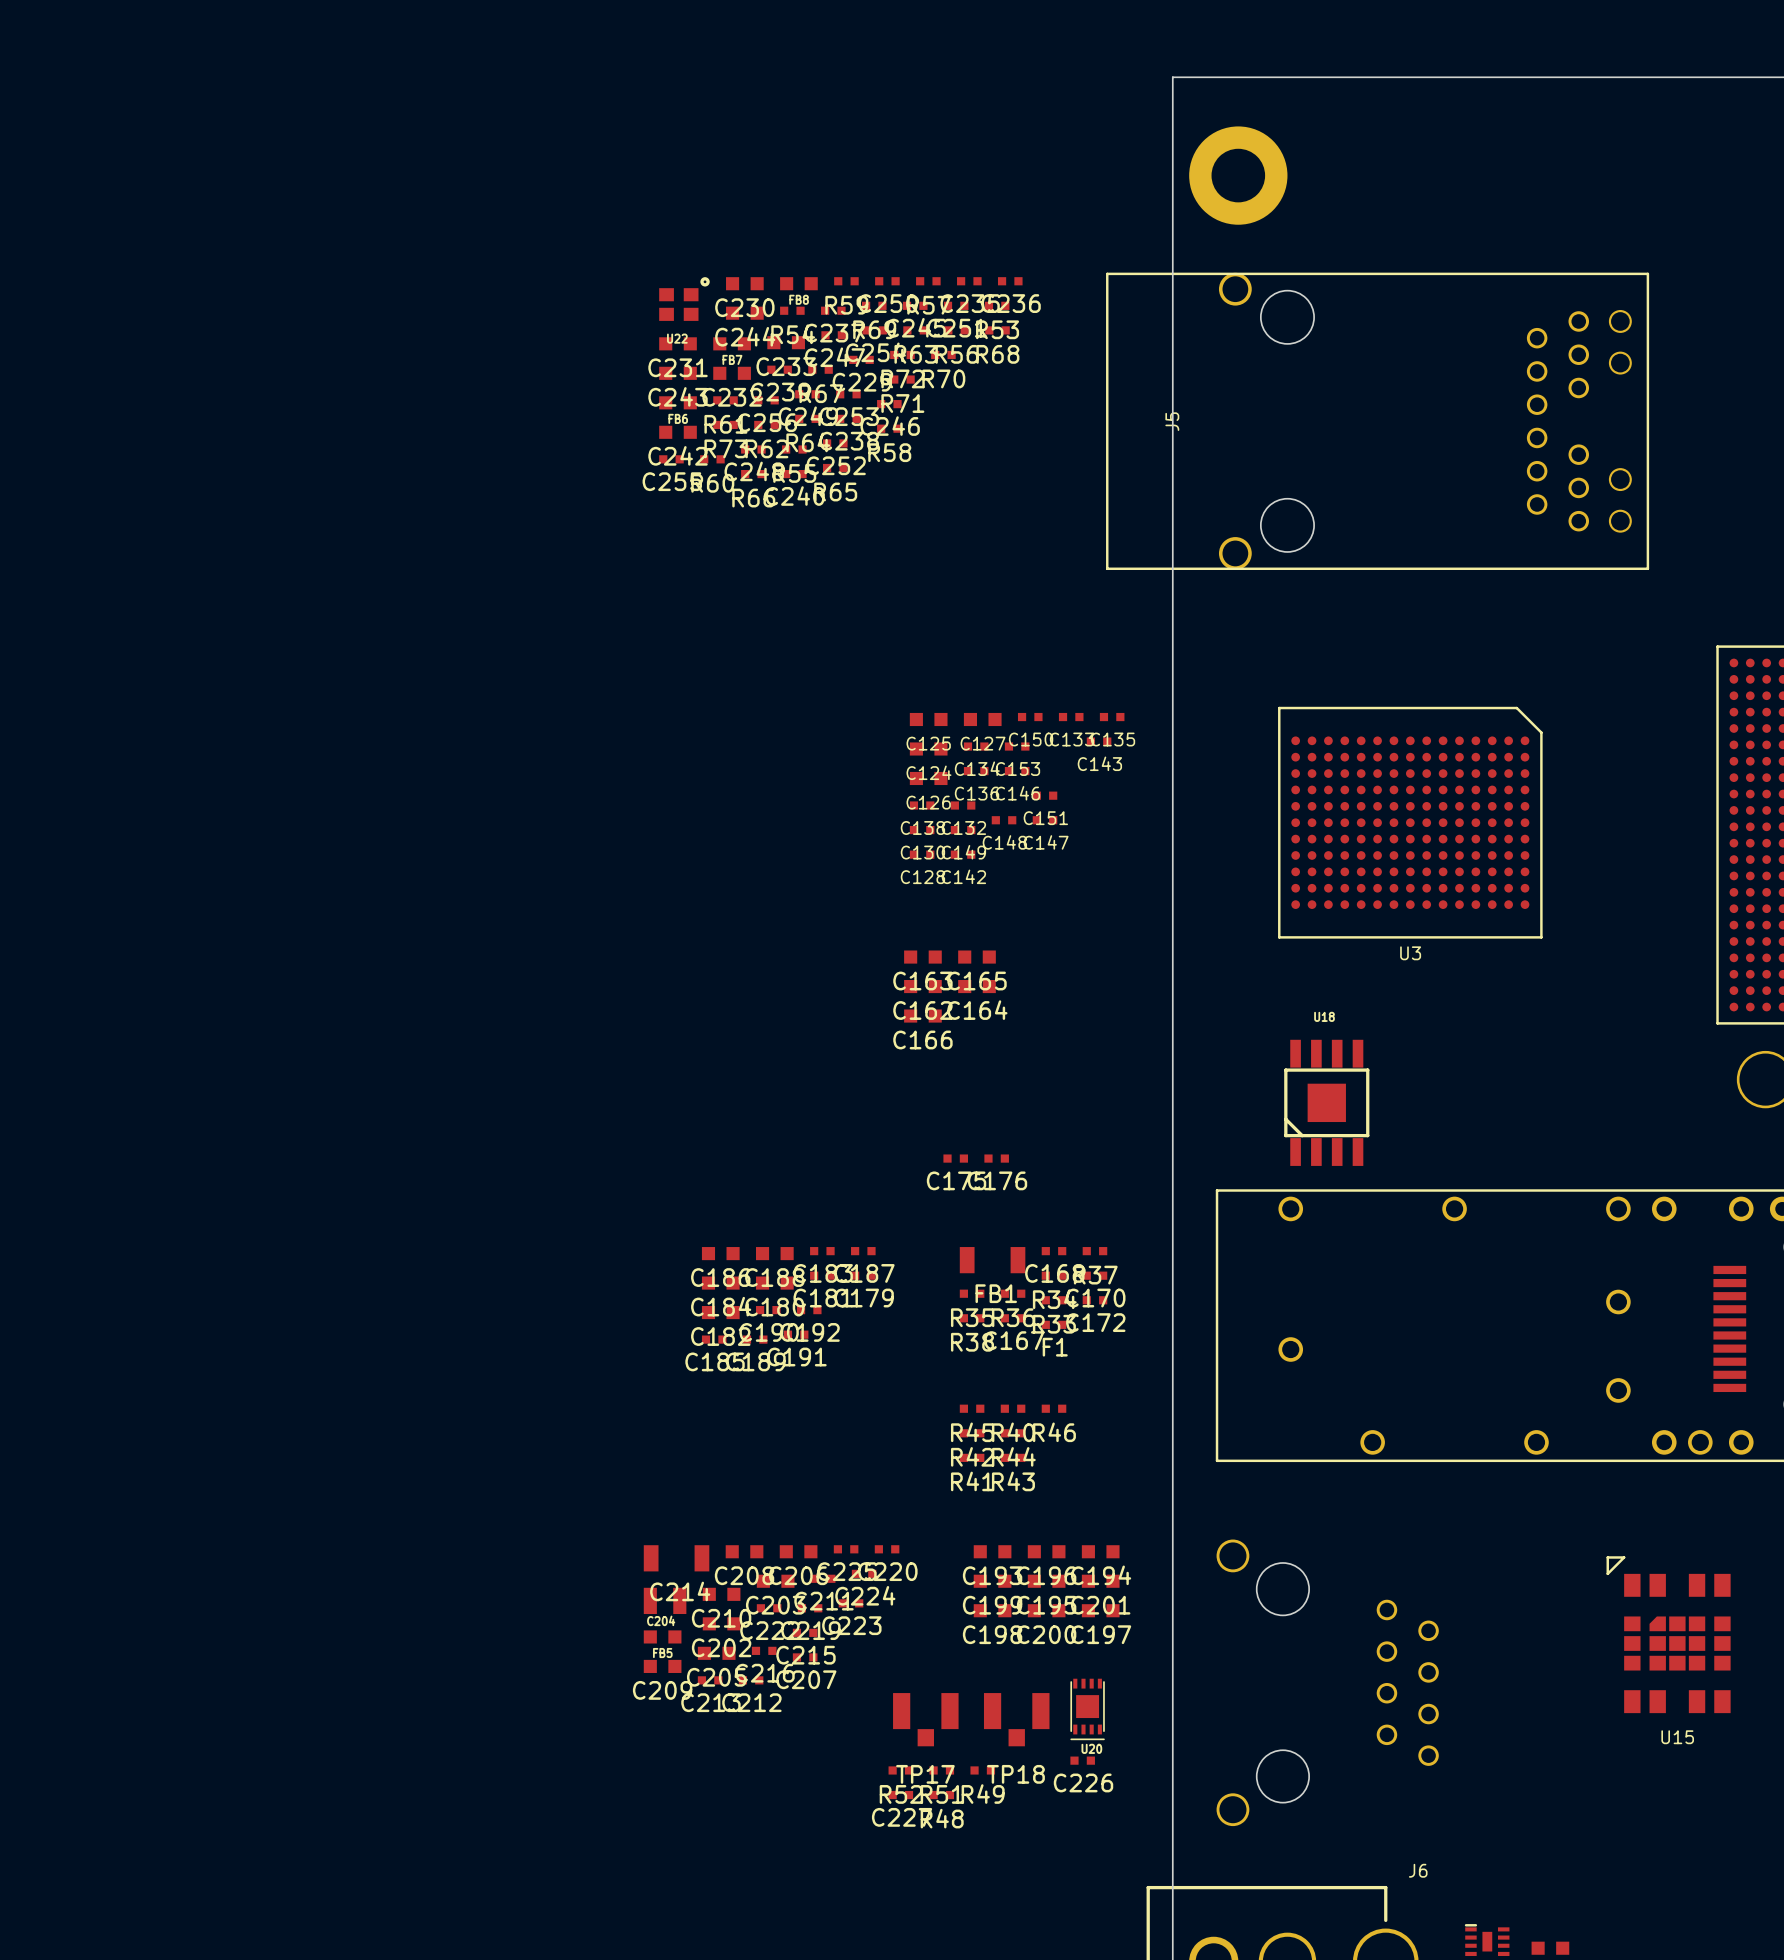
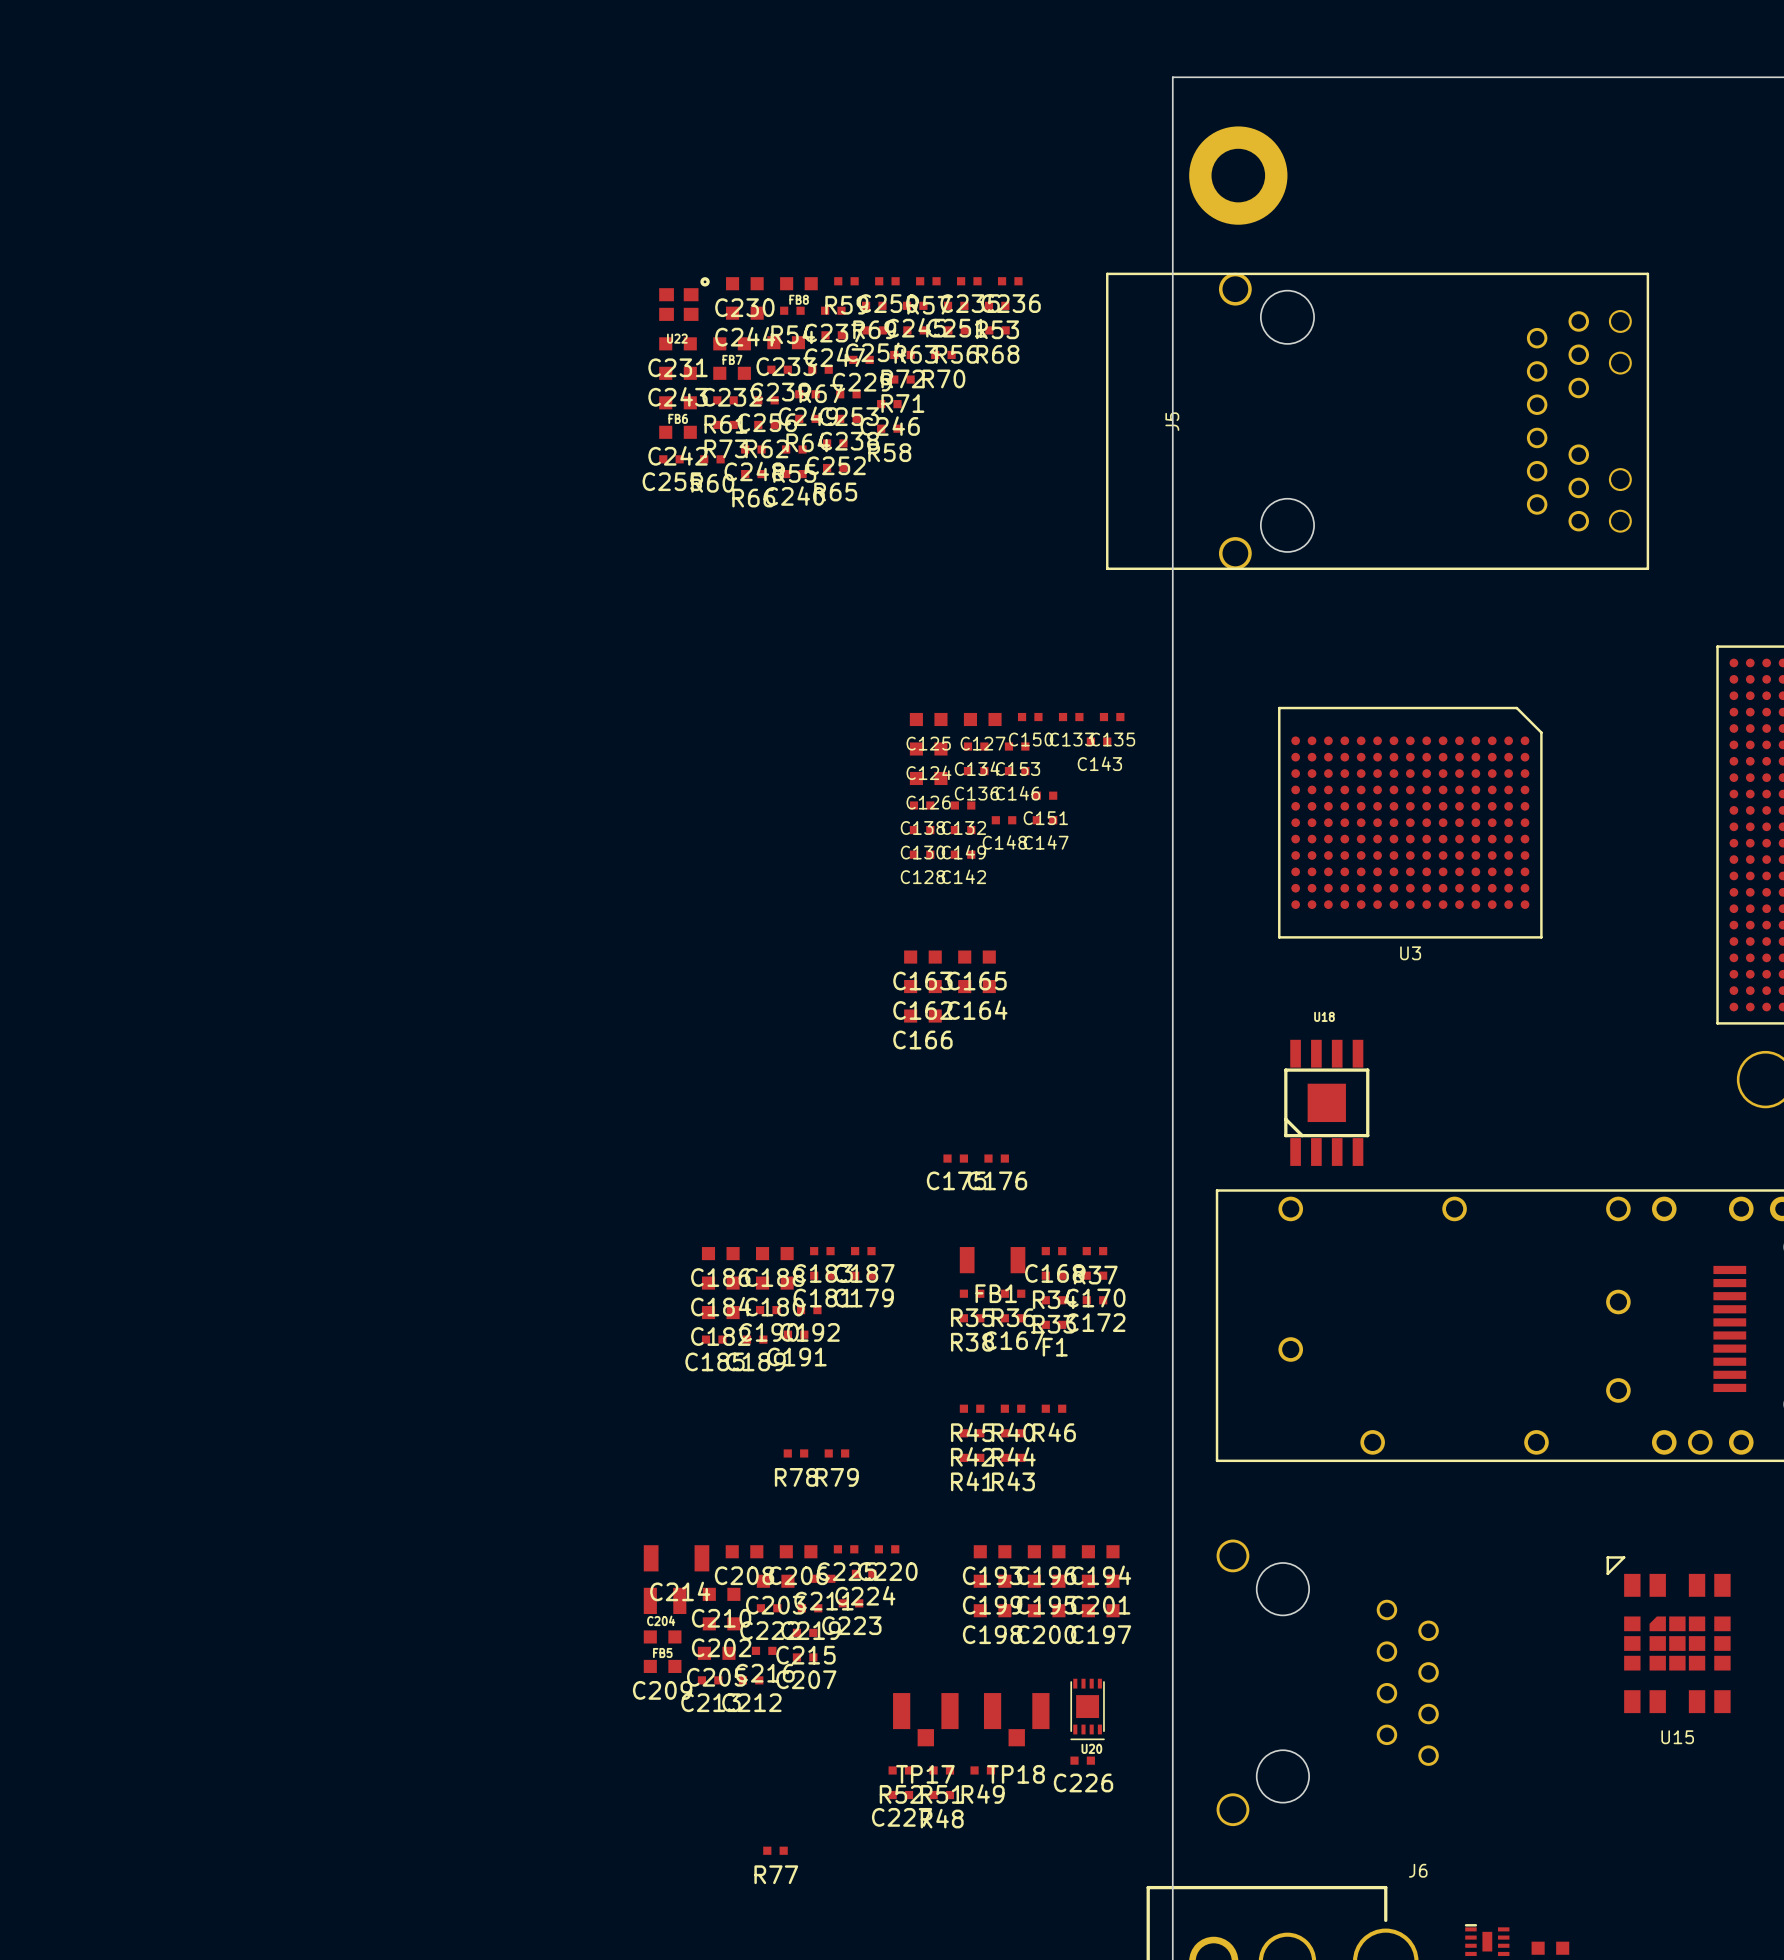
R78: none -> (795, 1453)
R79: none -> (836, 1453)
R77: none -> (775, 1850)

